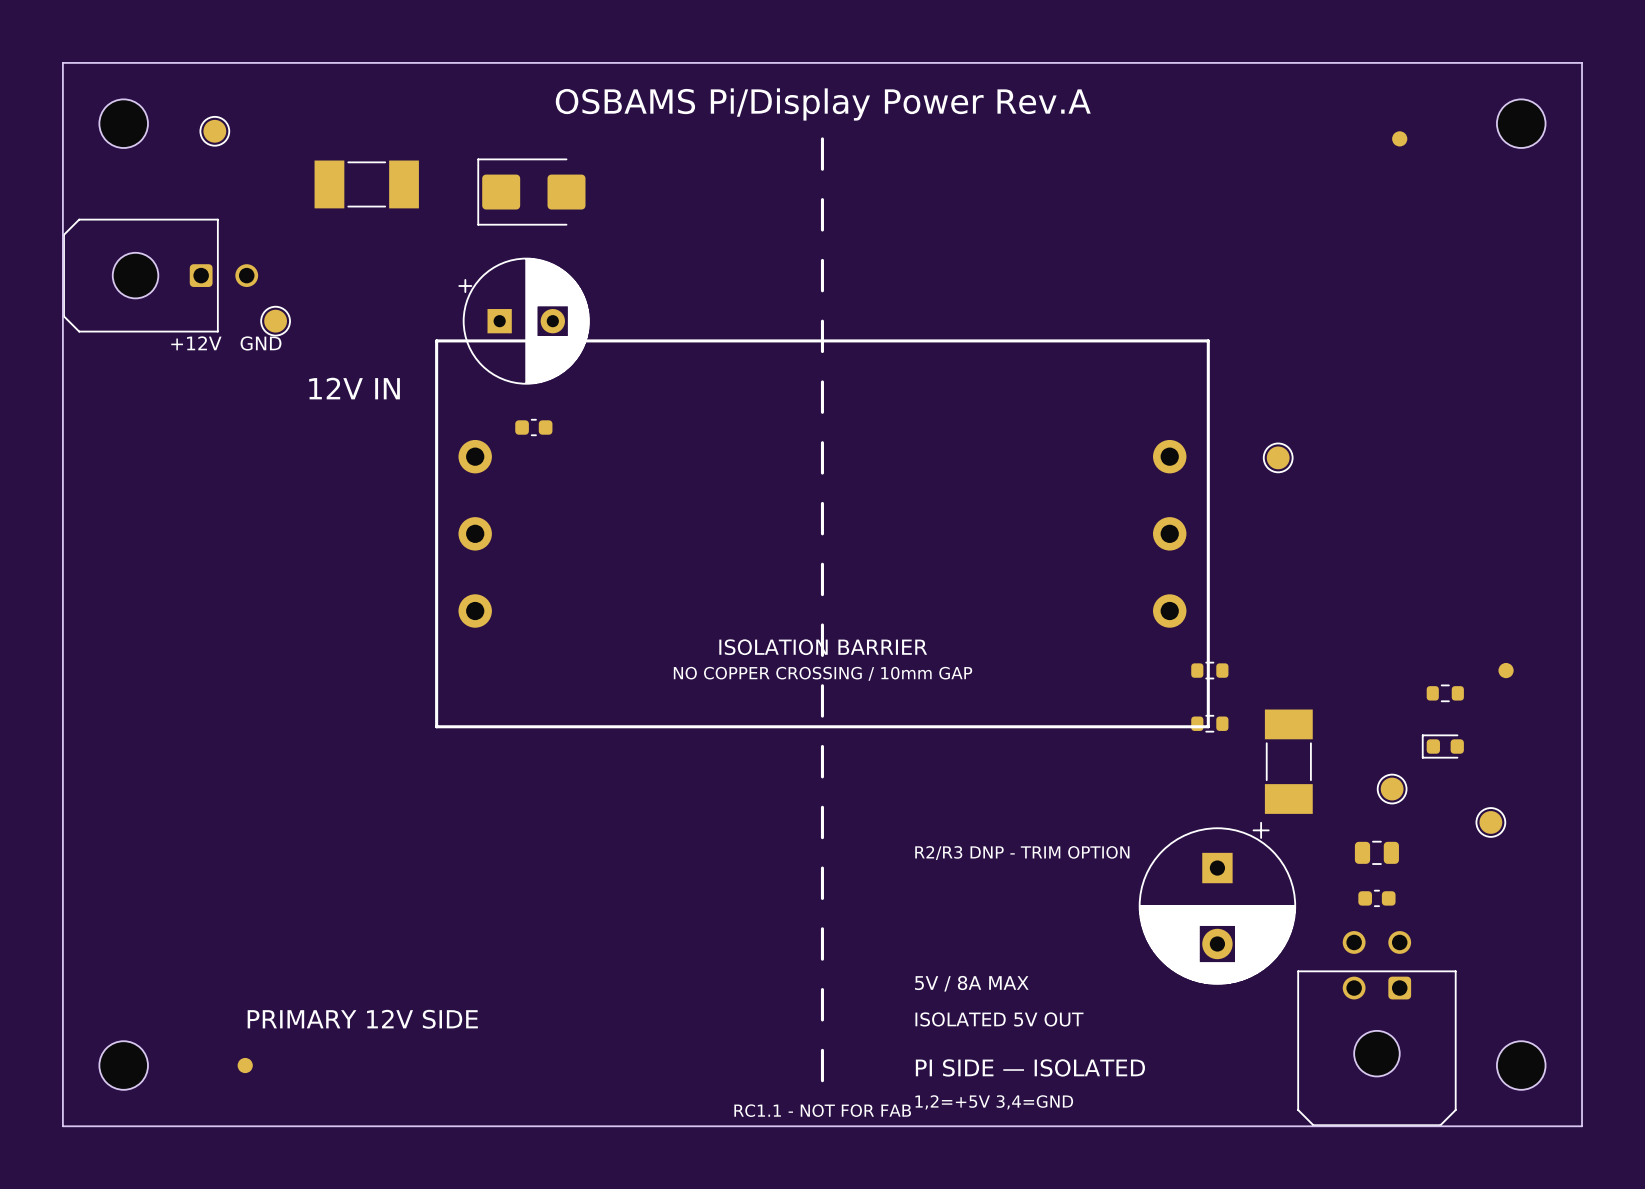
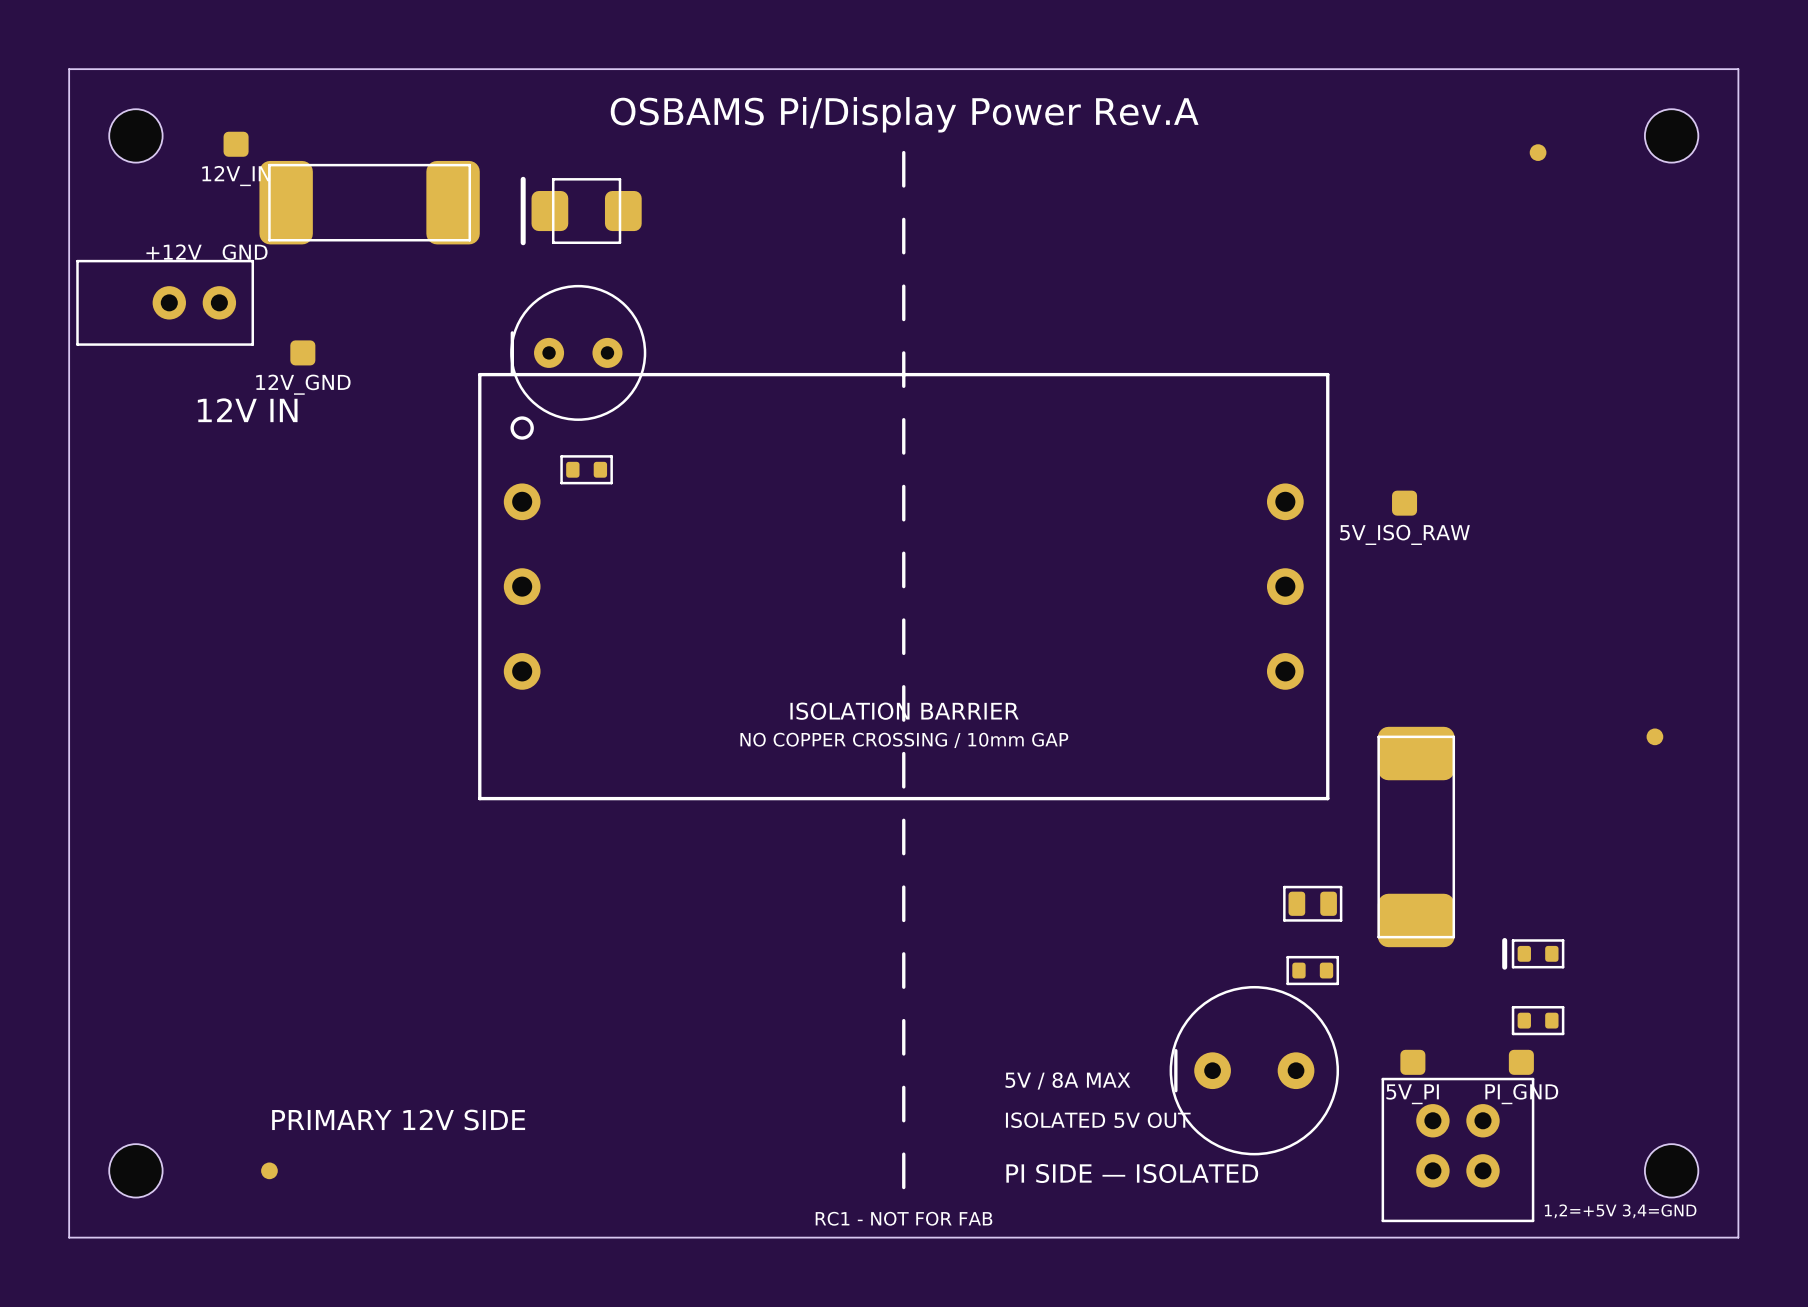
part footprint: [199, 115, 231, 147] -> [223, 131, 249, 157]
part footprint: [477, 158, 586, 226] -> [520, 176, 642, 246]
part: none -> (369, 202)
part: (366, 184) -> none
part footprint: [63, 218, 259, 333] -> [76, 259, 255, 346]
part footprint: [458, 257, 590, 385] -> [510, 284, 647, 421]
part footprint: [260, 305, 291, 337] -> [290, 340, 316, 366]
part footprint: [435, 339, 1210, 729] -> [478, 372, 1330, 801]
text position: +12V GND (226, 343) -> +12V GND (206, 252)
text position: 12V IN (354, 388) -> 12V IN (247, 410)
part footprint: [515, 418, 553, 437] -> [560, 455, 613, 485]
part footprint: [1262, 442, 1294, 474] -> [1392, 490, 1418, 516]
part: (1209, 670) -> none
part: (1445, 693) -> none
part footprint: [1264, 709, 1313, 814] -> [1377, 726, 1456, 948]
part: (1209, 723) -> none
part: (1442, 746) -> none
part: (1392, 789) -> none
part: none -> (1312, 903)
part: (1490, 822) -> none
part: (1376, 852) -> none
text: R2/R3 DNP - TRIM OPTION (1022, 853) -> none
part: none -> (1533, 953)
part: none -> (1312, 970)
part: (1376, 898) -> none
part: (1217, 903) -> none
part: none -> (1538, 1020)
part: none -> (1412, 1062)
part: none -> (1521, 1062)
part: none -> (1254, 1070)
part: (1376, 1028) -> none
part: none -> (1457, 1149)
text: 1,2=+5V 3,4=GND (994, 1102) -> none
text: none -> 1,2=+5V 3,4=GND (1620, 1211)
text: RC1.1 - NOT FOR FAB (822, 1110) -> RC1 - NOT FOR FAB (904, 1218)

